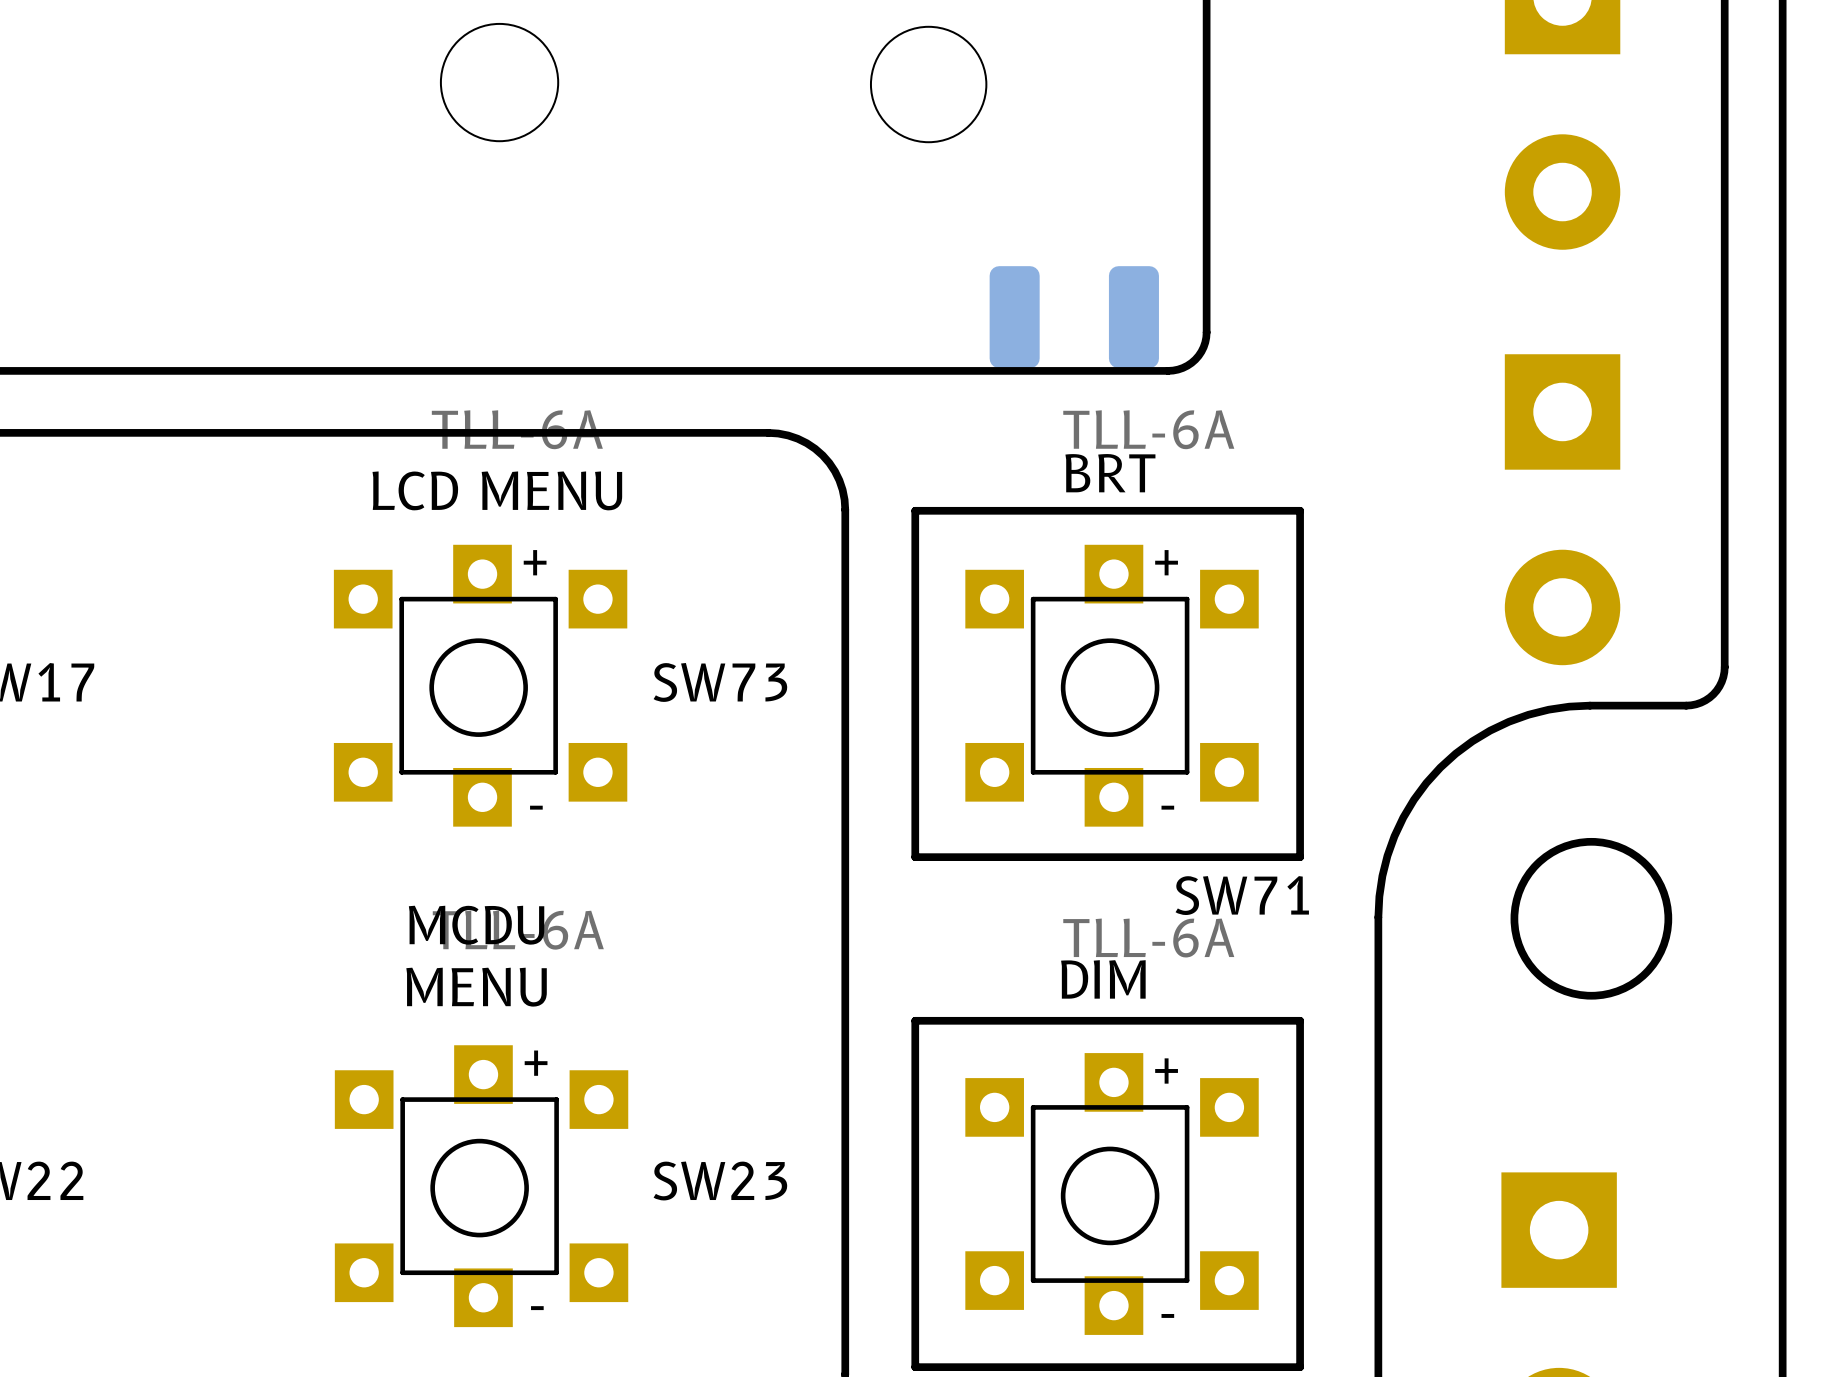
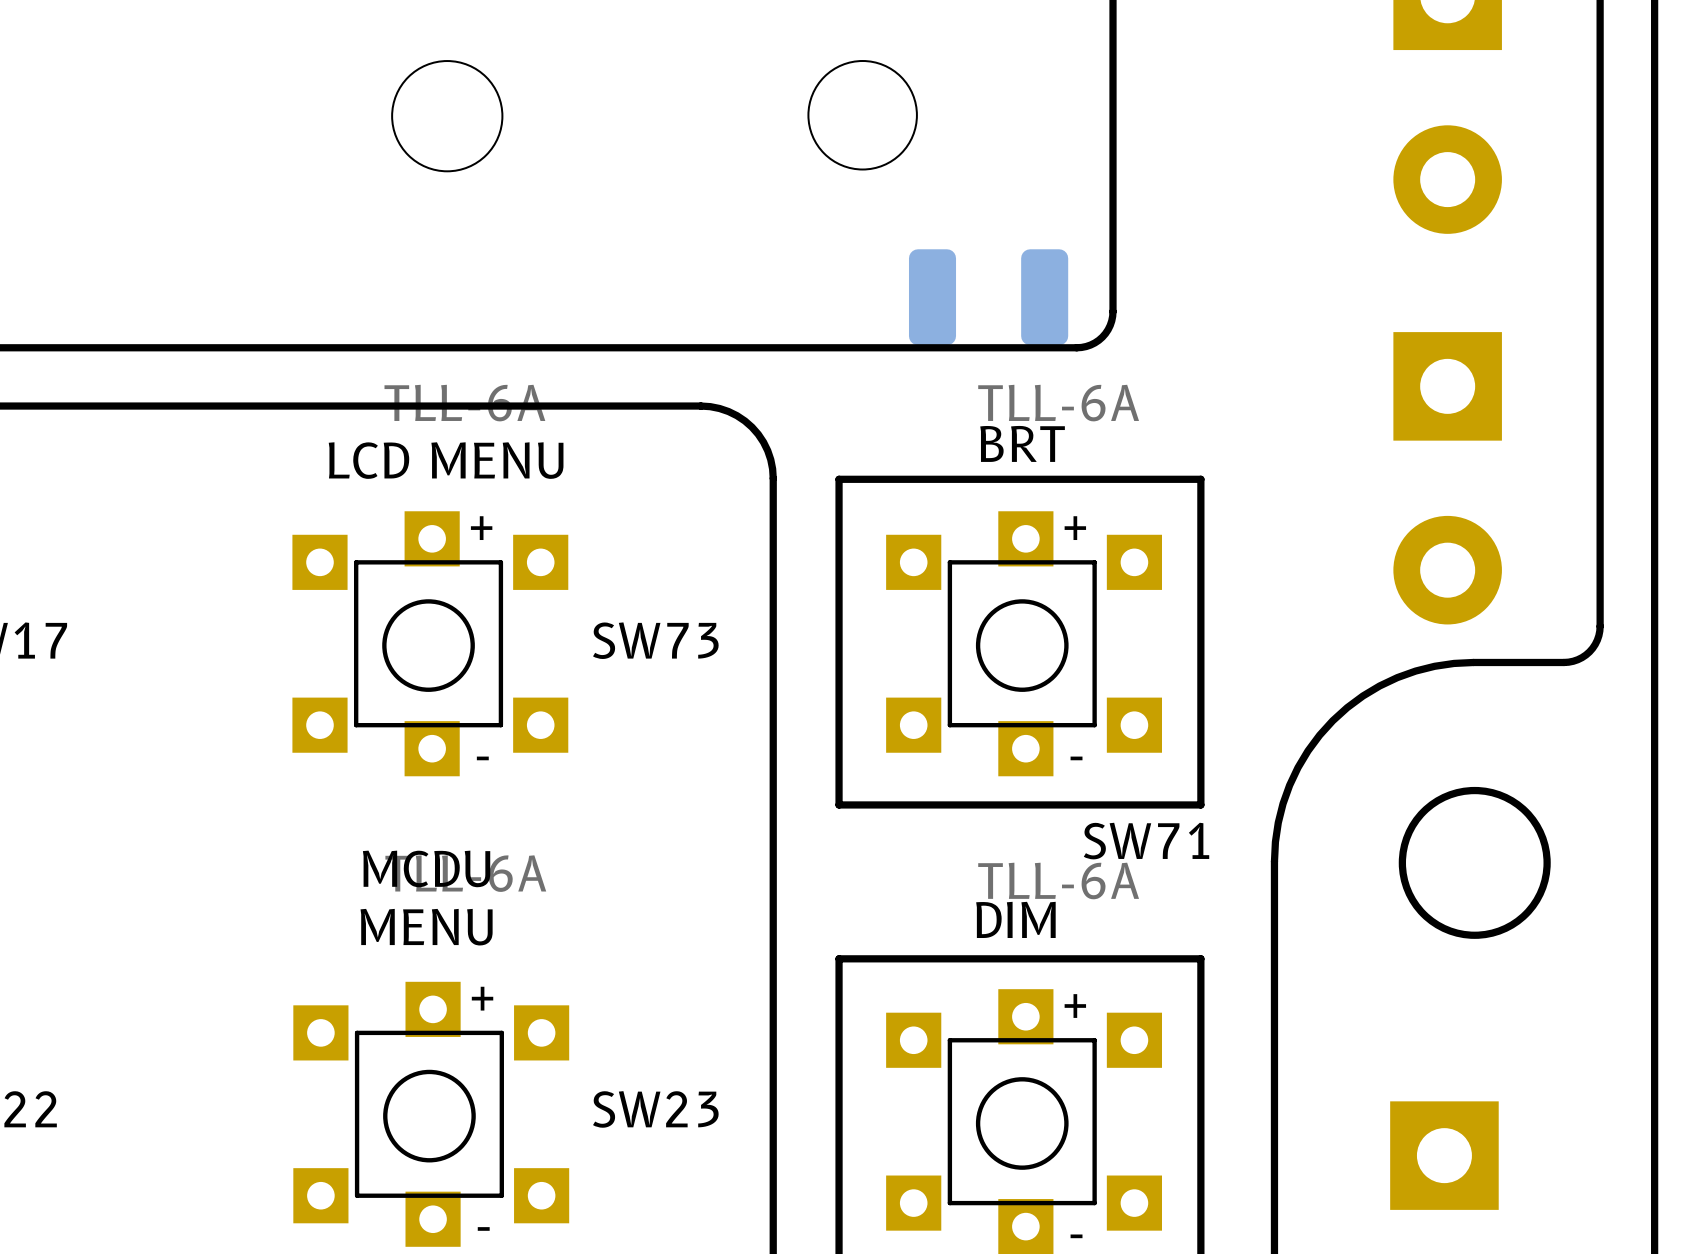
round board edge position: (499, 82) -> (447, 116)
round board edge position: (928, 84) -> (862, 115)

